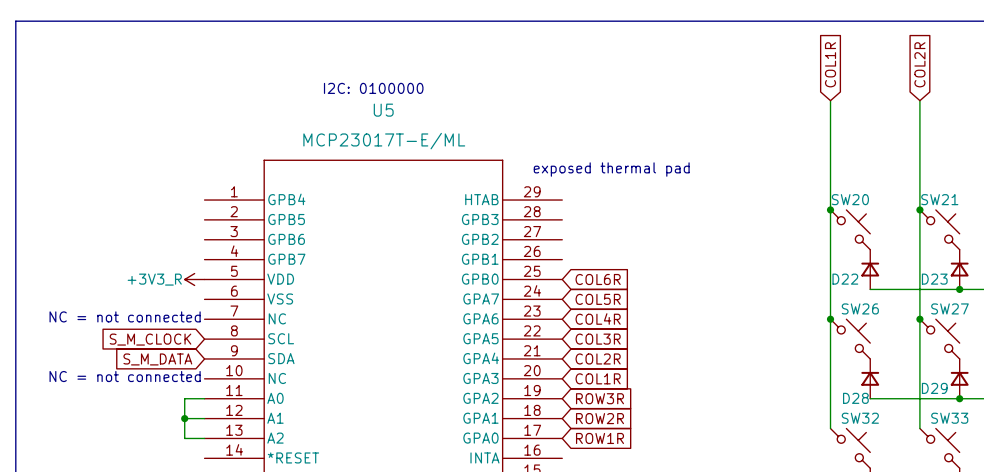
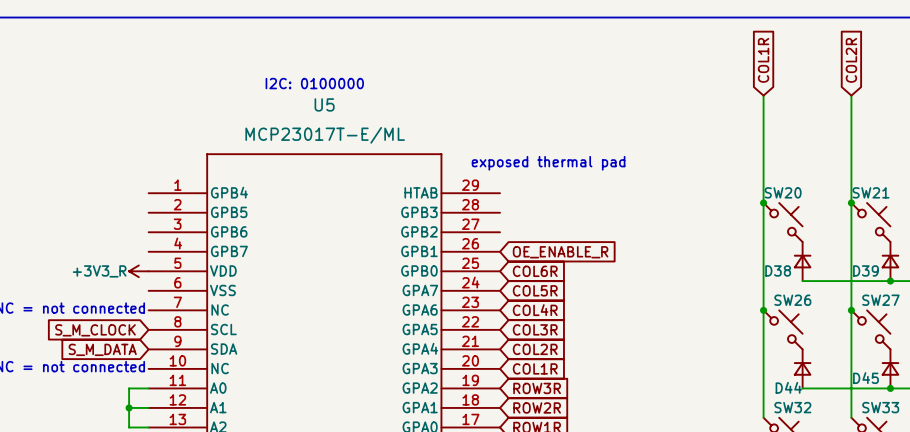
global label: none -> OE_ENABLE_R (560, 252)
D22 name: D22 (845, 279) -> D38 (778, 270)
D23 name: D23 (934, 279) -> D39 (865, 270)
D29 name: D29 (934, 388) -> D45 (865, 378)
D28 name: D28 (855, 398) -> D44 (788, 387)

